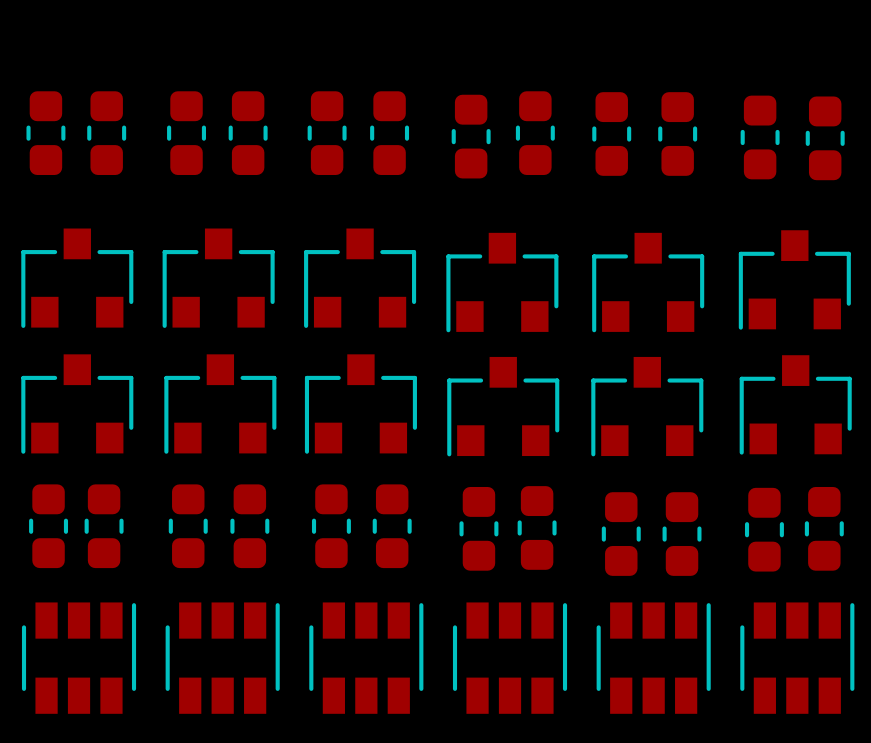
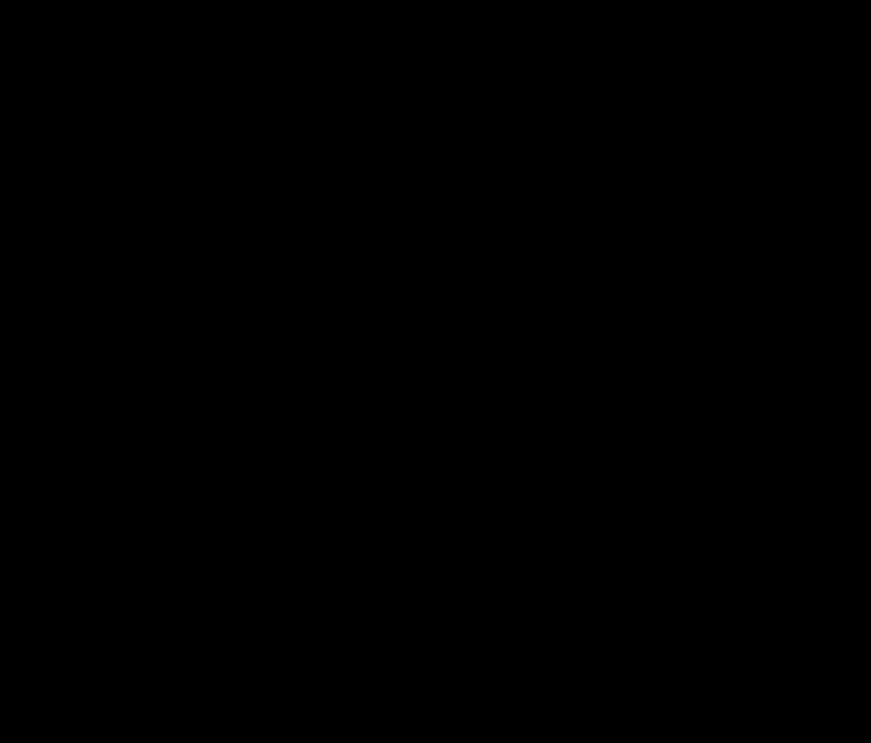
part: (45, 133) -> none
part: (106, 133) -> none
part: (186, 133) -> none
part: (248, 133) -> none
part: (327, 133) -> none
part: (389, 133) -> none
part: (535, 133) -> none
part: (611, 134) -> none
part: (677, 134) -> none
part: (471, 136) -> none
part: (760, 137) -> none
part: (825, 138) -> none
part: (77, 278) -> none
part: (218, 278) -> none
part: (360, 278) -> none
part: (794, 279) -> none
part: (502, 282) -> none
part: (648, 282) -> none
part: (77, 404) -> none
part: (220, 404) -> none
part: (360, 404) -> none
part: (795, 404) -> none
part: (503, 406) -> none
part: (647, 406) -> none
part: (48, 526) -> none
part: (104, 526) -> none
part: (188, 526) -> none
part: (249, 526) -> none
part: (331, 526) -> none
part: (392, 526) -> none
part: (537, 527) -> none
part: (478, 528) -> none
part: (824, 528) -> none
part: (764, 529) -> none
part: (621, 534) -> none
part: (682, 534) -> none
part: (79, 658) -> none
part: (222, 658) -> none
part: (366, 658) -> none
part: (510, 658) -> none
part: (653, 658) -> none
part: (797, 658) -> none

